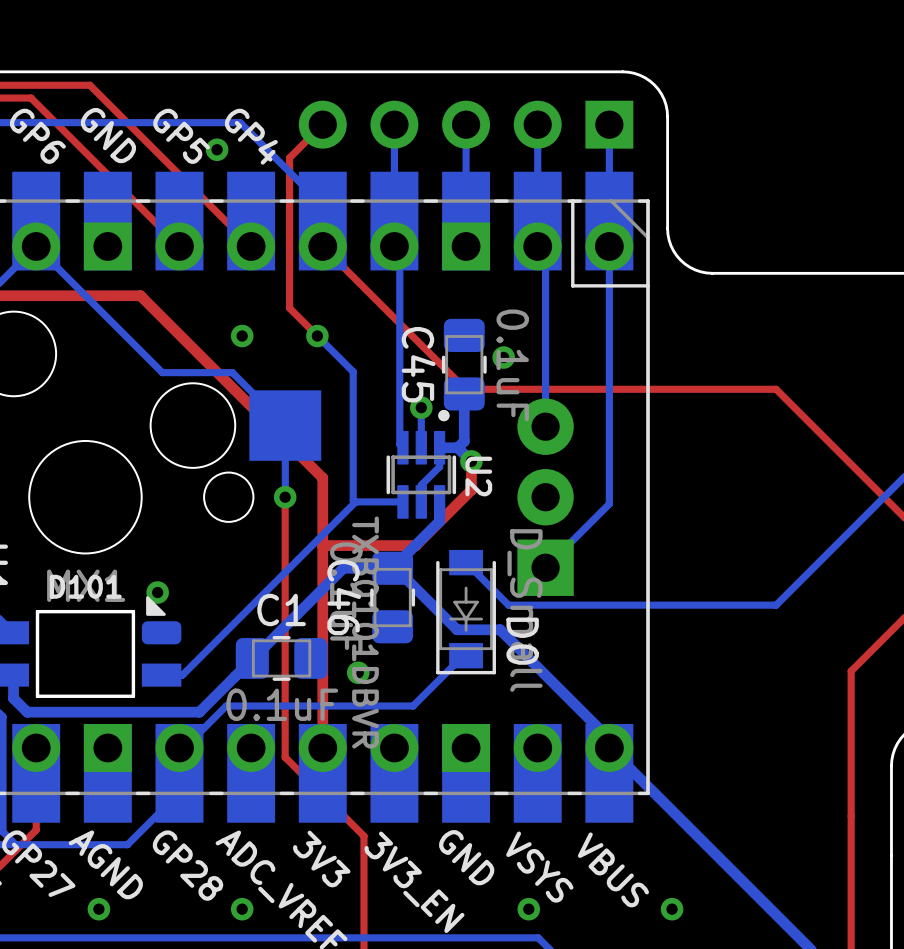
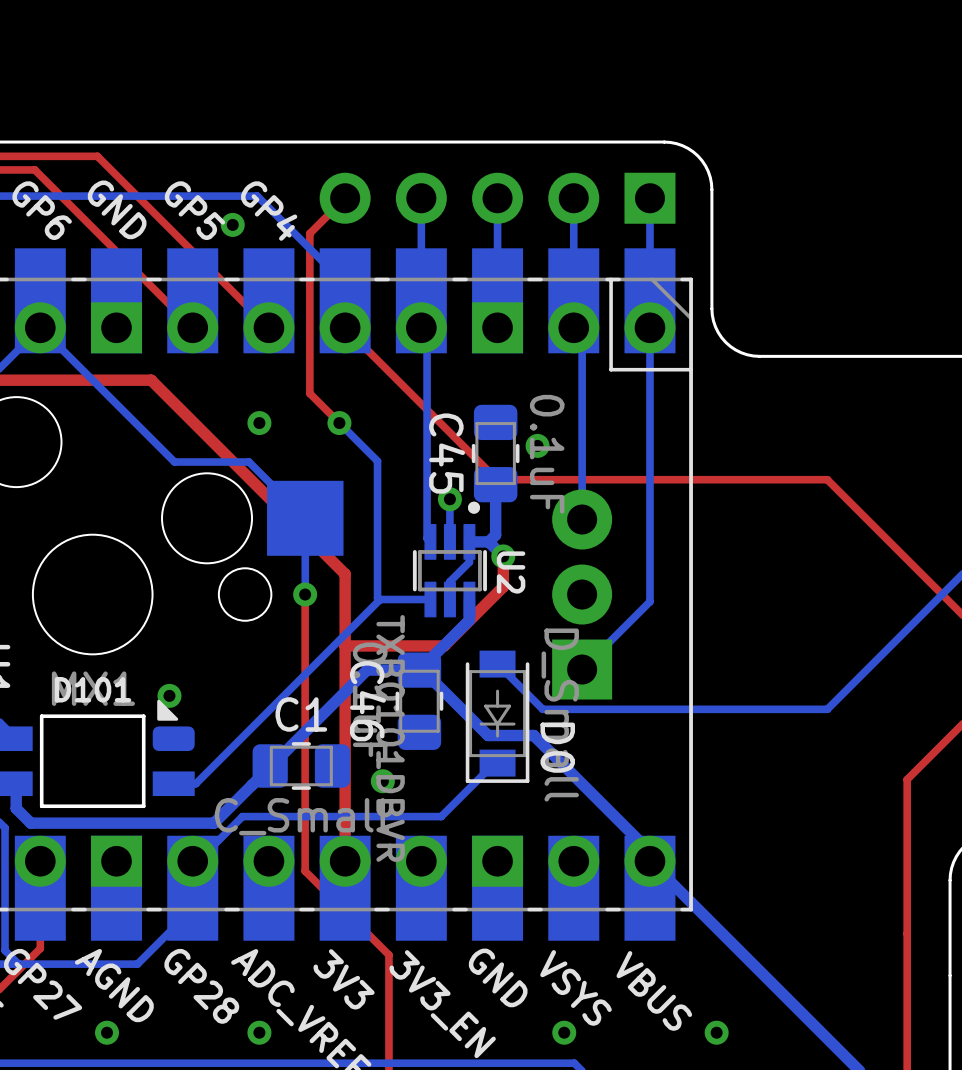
C1 value: 0.1uF (282, 704) -> C_Small (302, 816)

